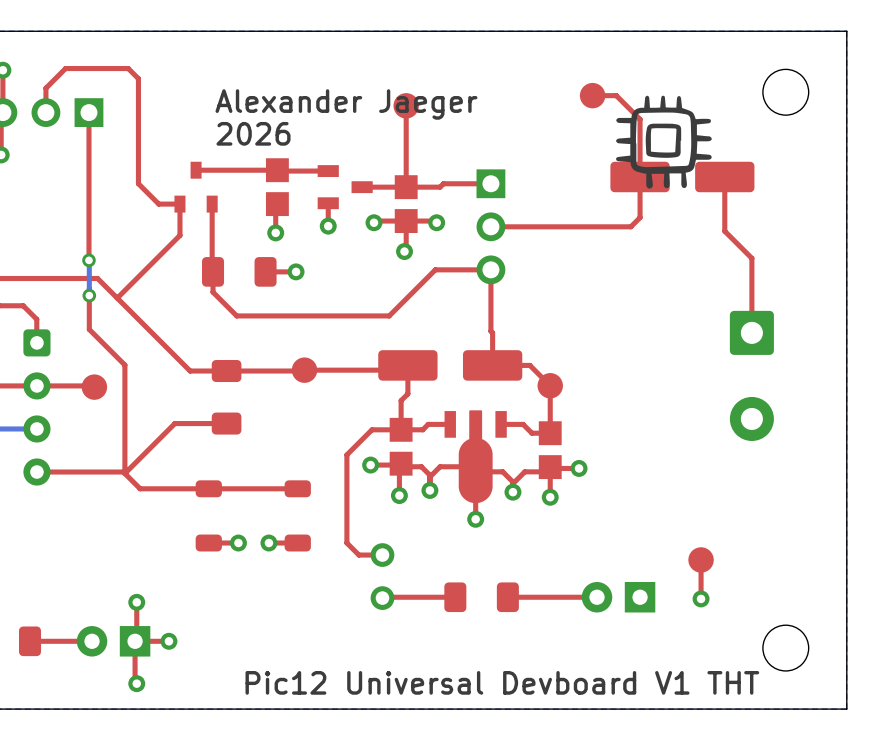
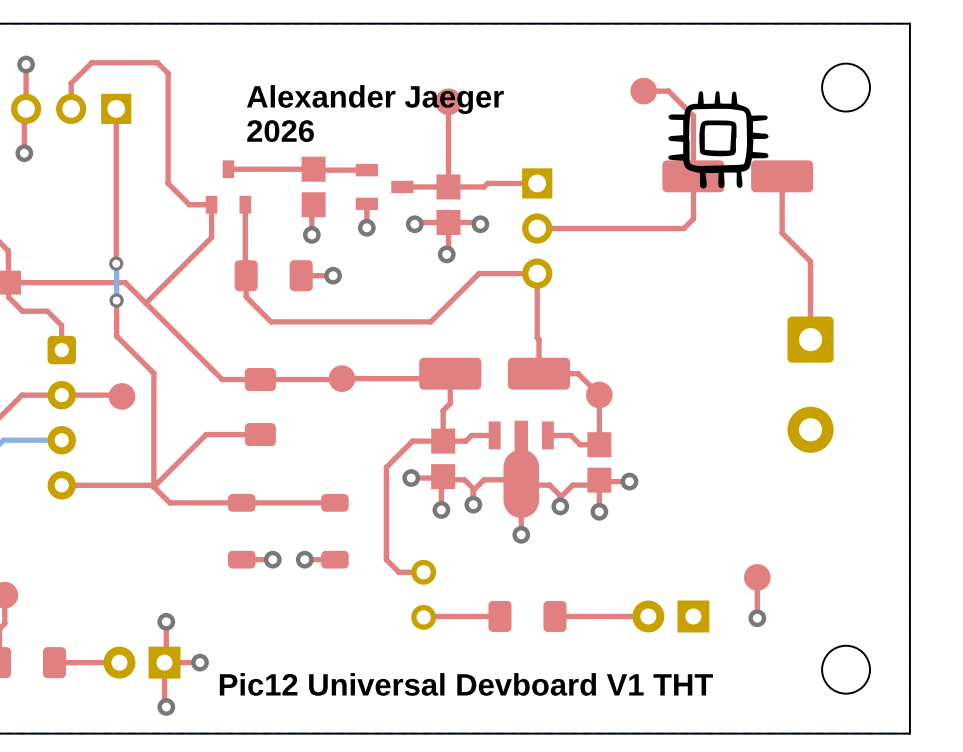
text position: Pic12 Universal Devboard V1 THT (502, 682) -> Pic12 Universal Devboard V1 THT (466, 684)

